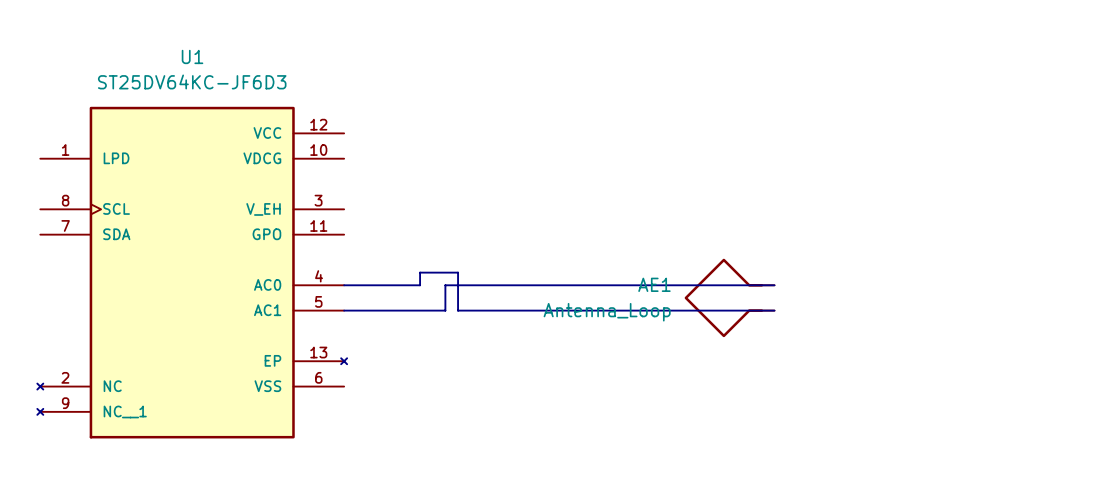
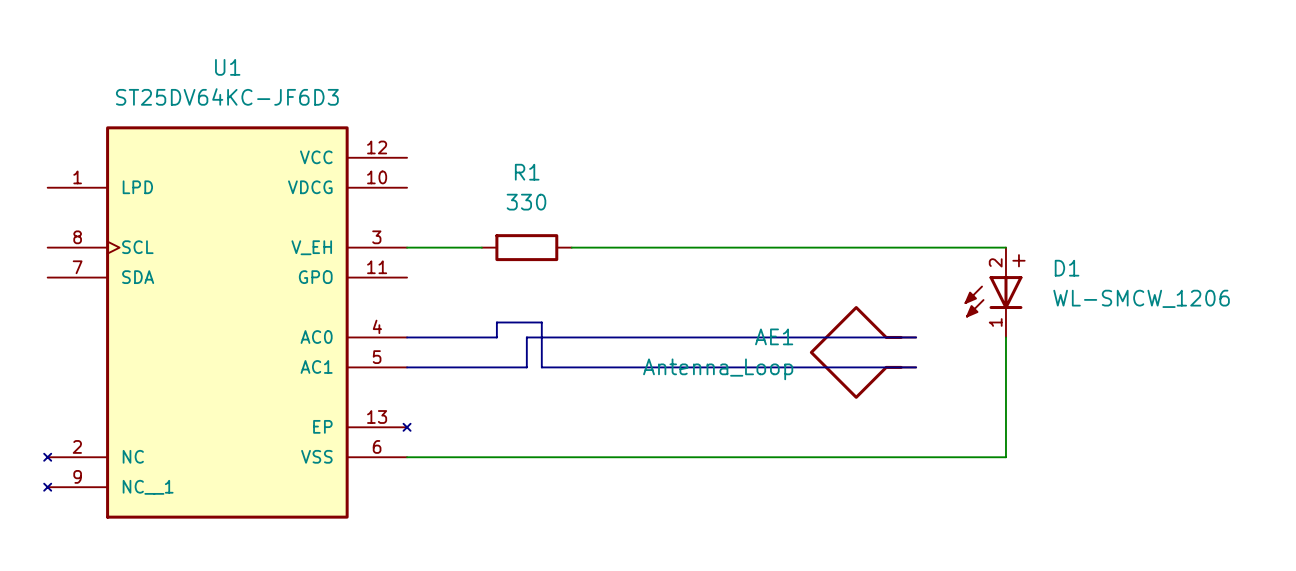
wire: none -> (407, 247) (481, 247)
R1: none -> 330 (526, 247)
wire: none -> (571, 247) (1005, 247)
D1: none -> WL-SMCW_1206 (993, 292)
wire: none -> (1005, 337) (1005, 457) (407, 457)

